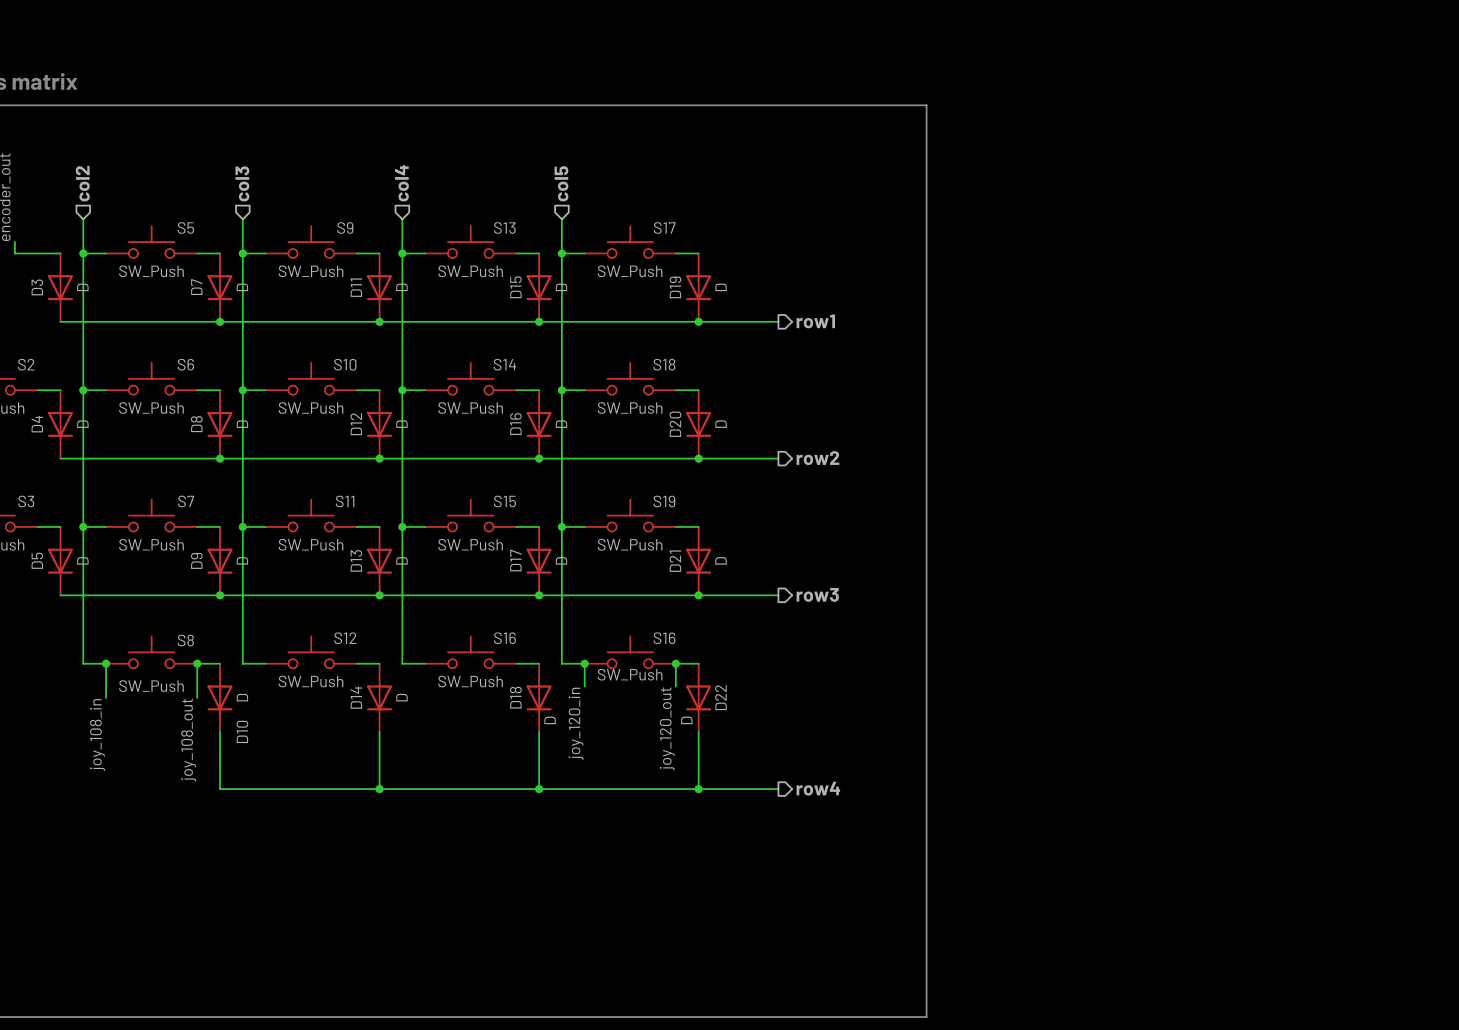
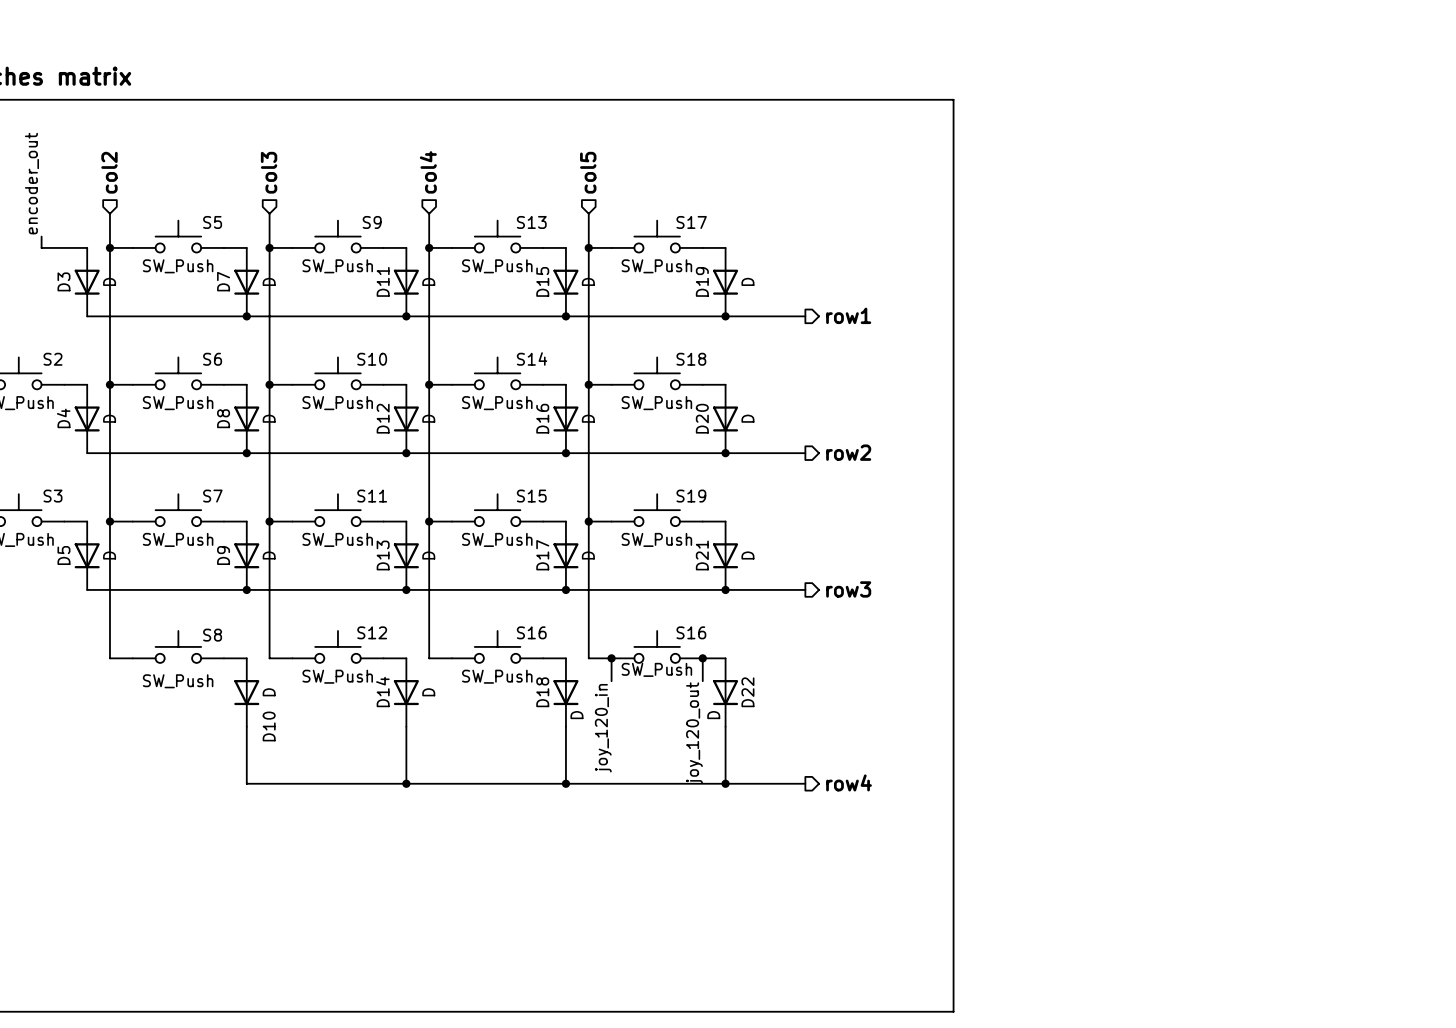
wire: (106, 663) (106, 697) -> none
junction: (106, 663) -> none
wire: (197, 663) (197, 697) -> none
junction: (197, 663) -> none
label: joy_108_in (97, 735) -> none
label: joy_108_out (188, 740) -> none

